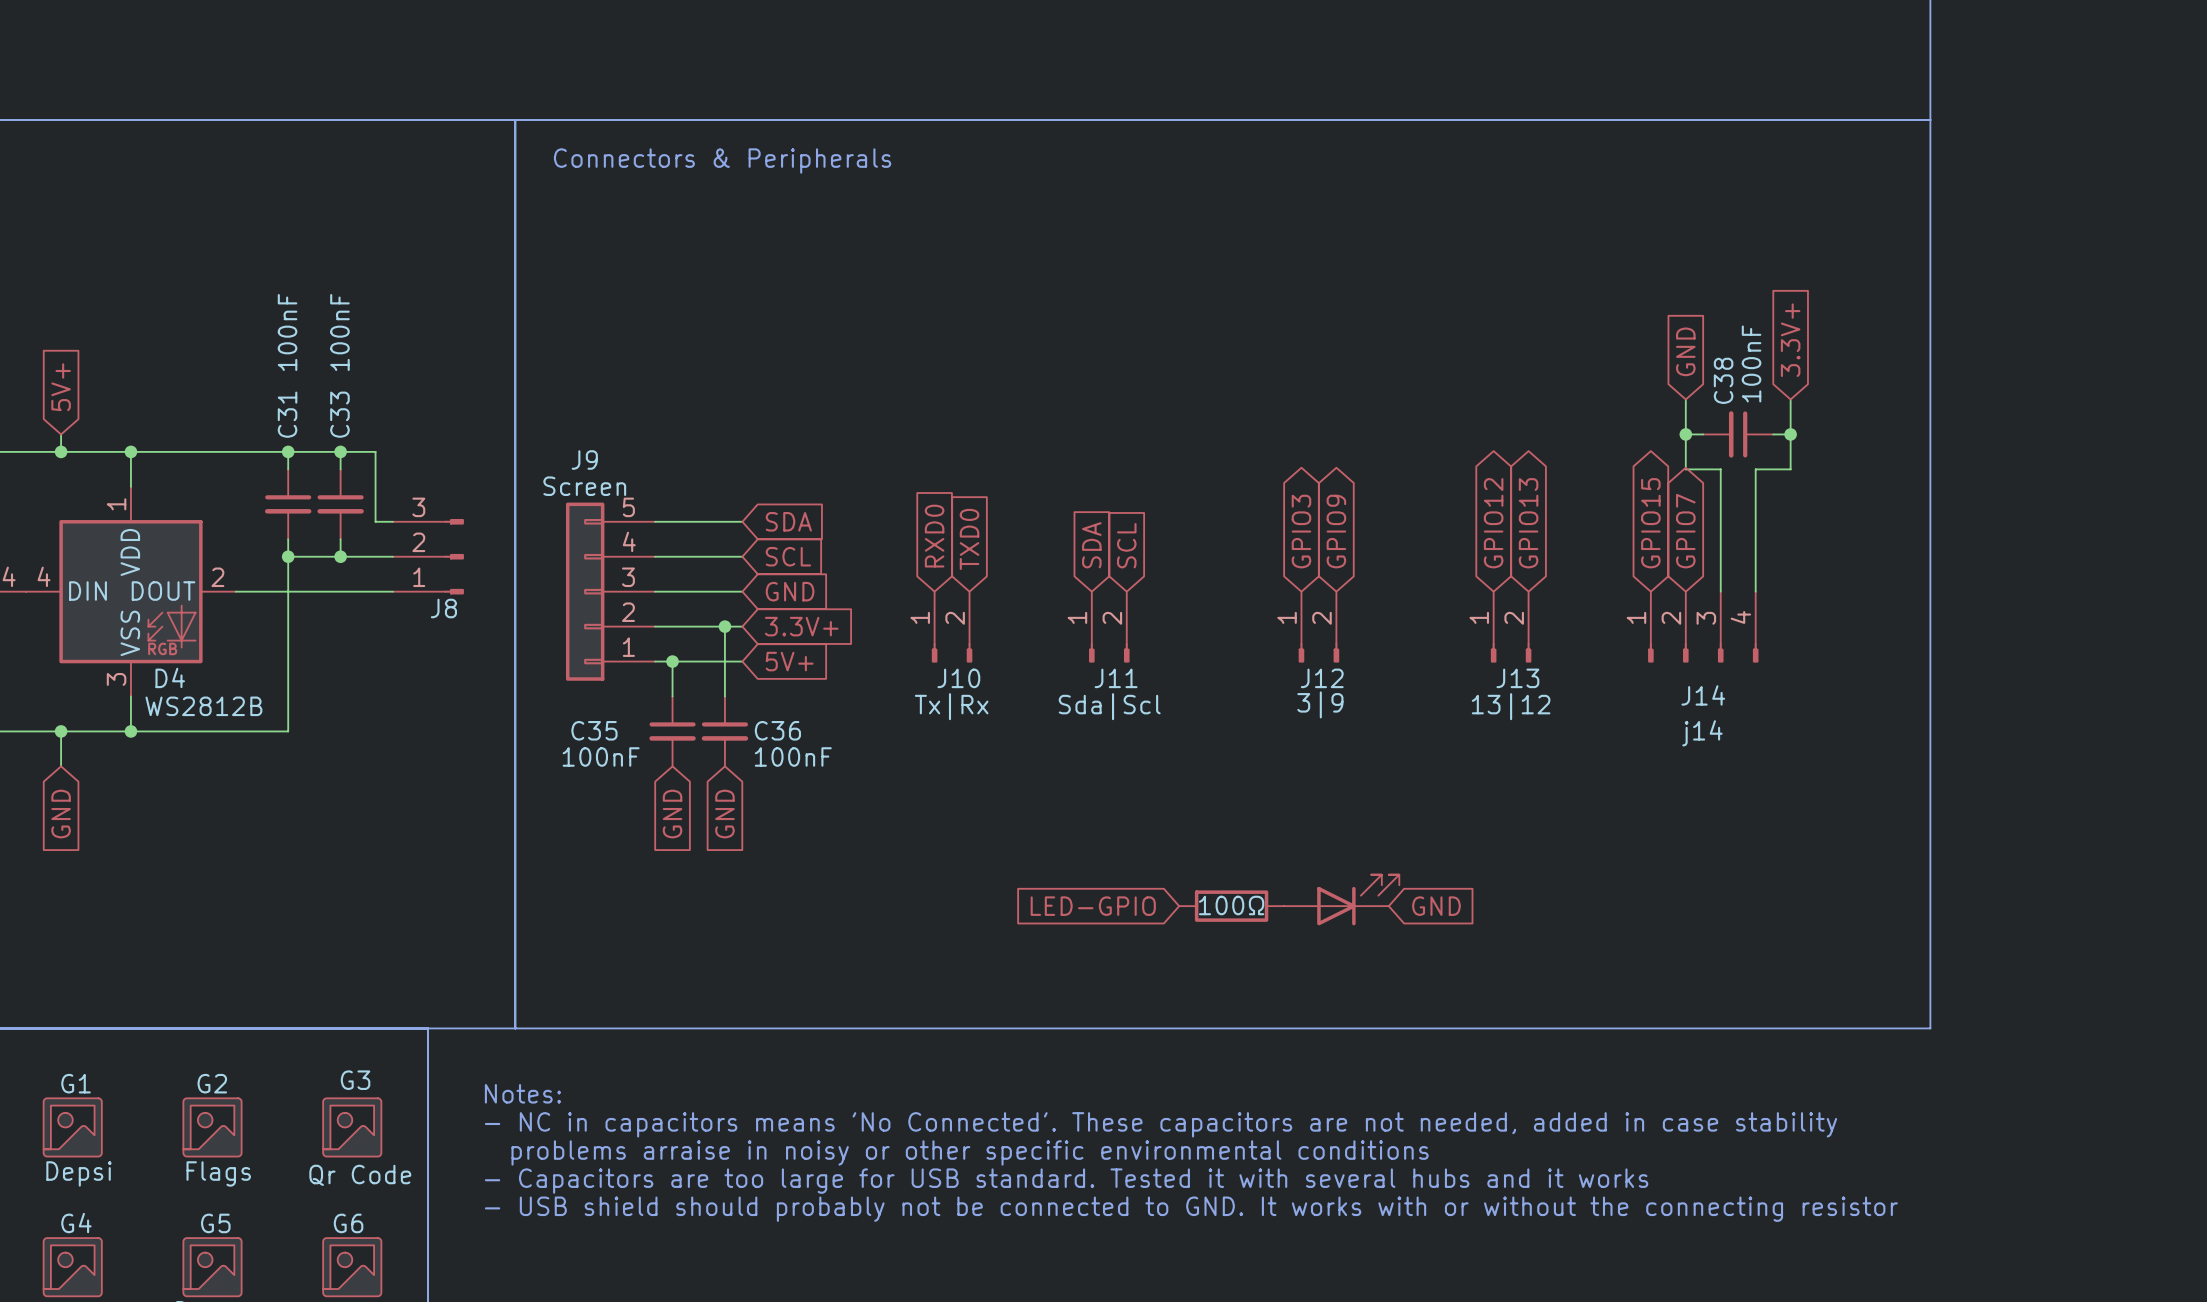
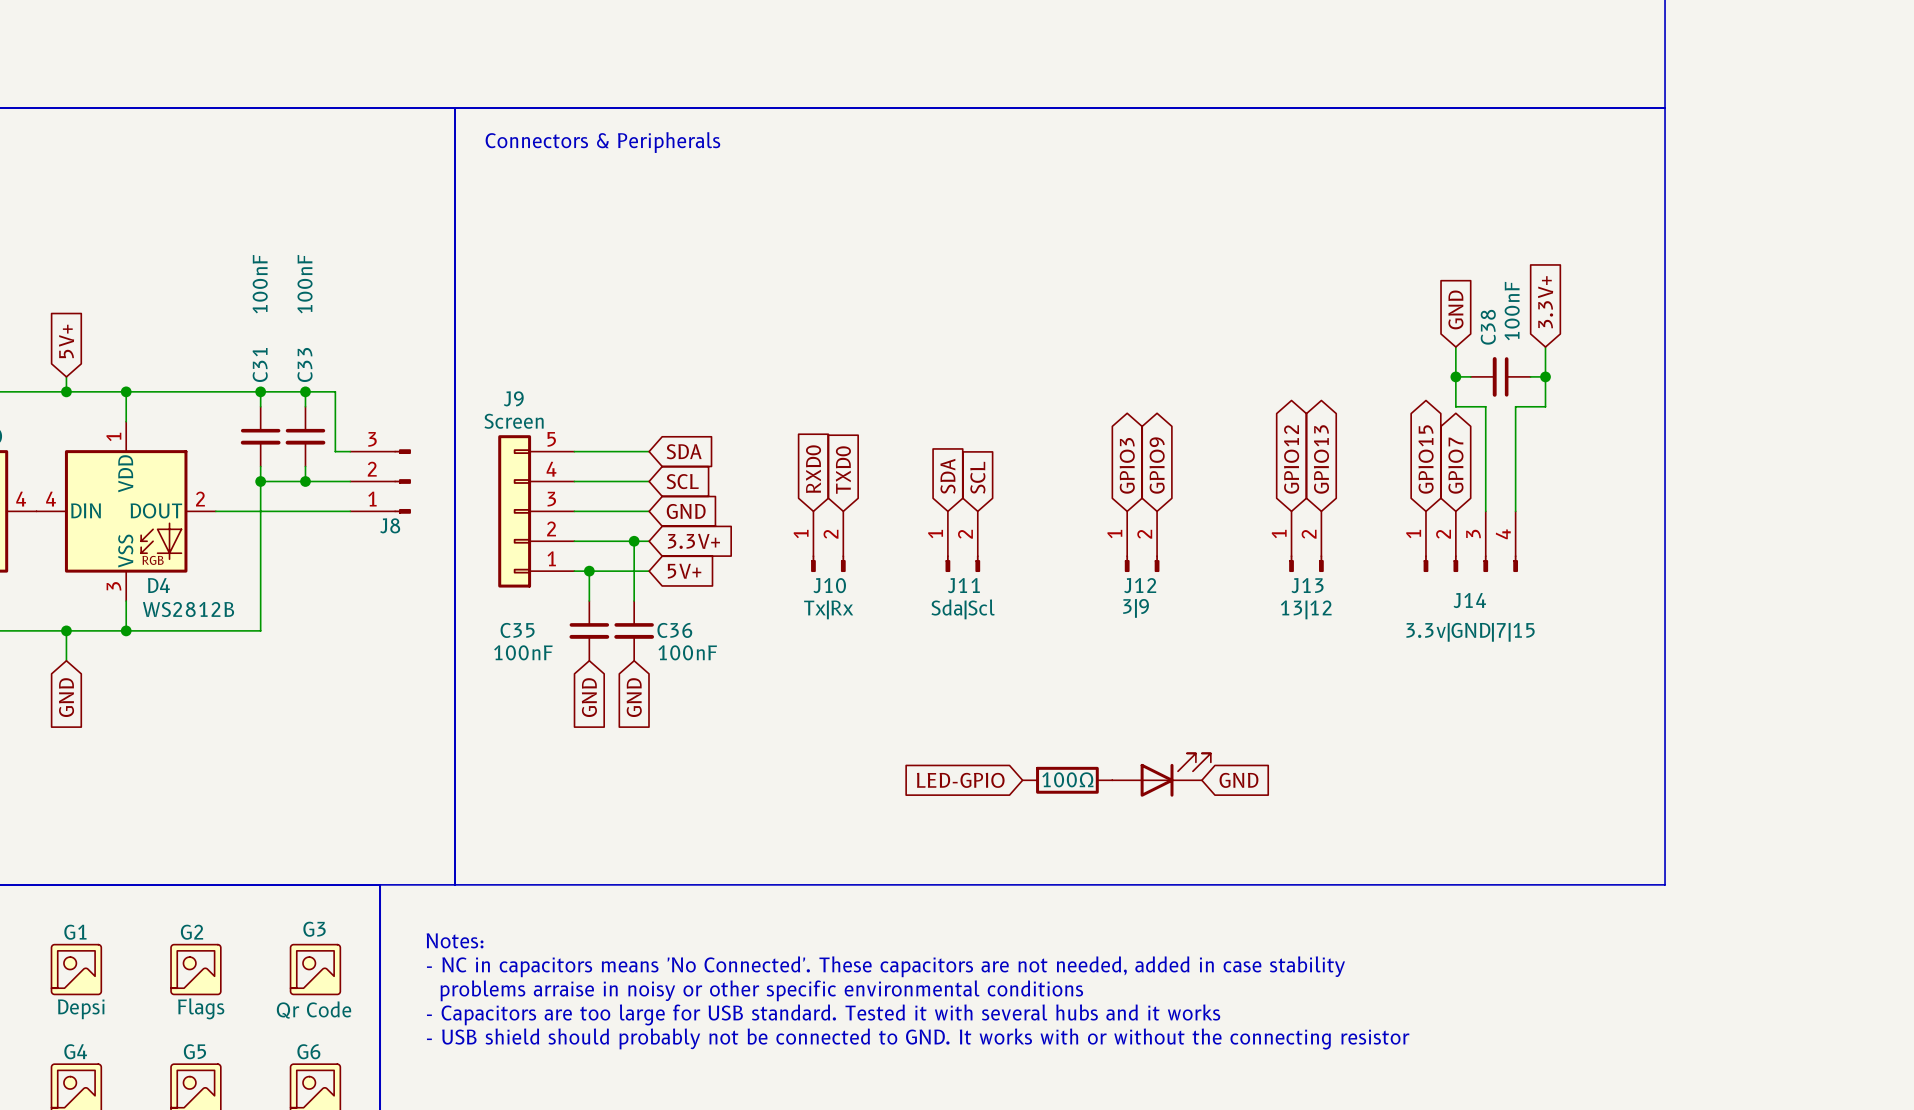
J14 value: j14 (1702, 733) -> 3.3v|GND|7|15 (1470, 632)

